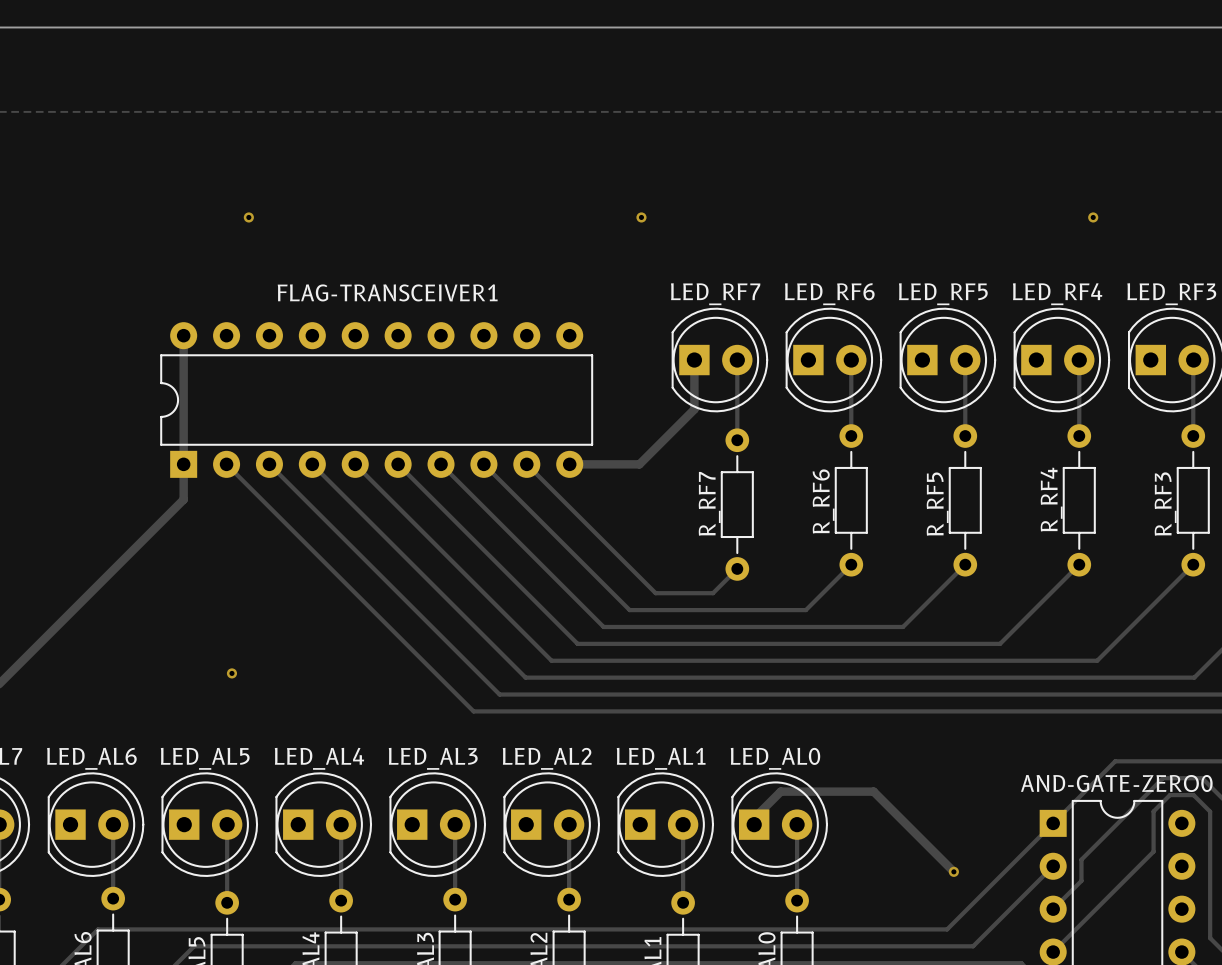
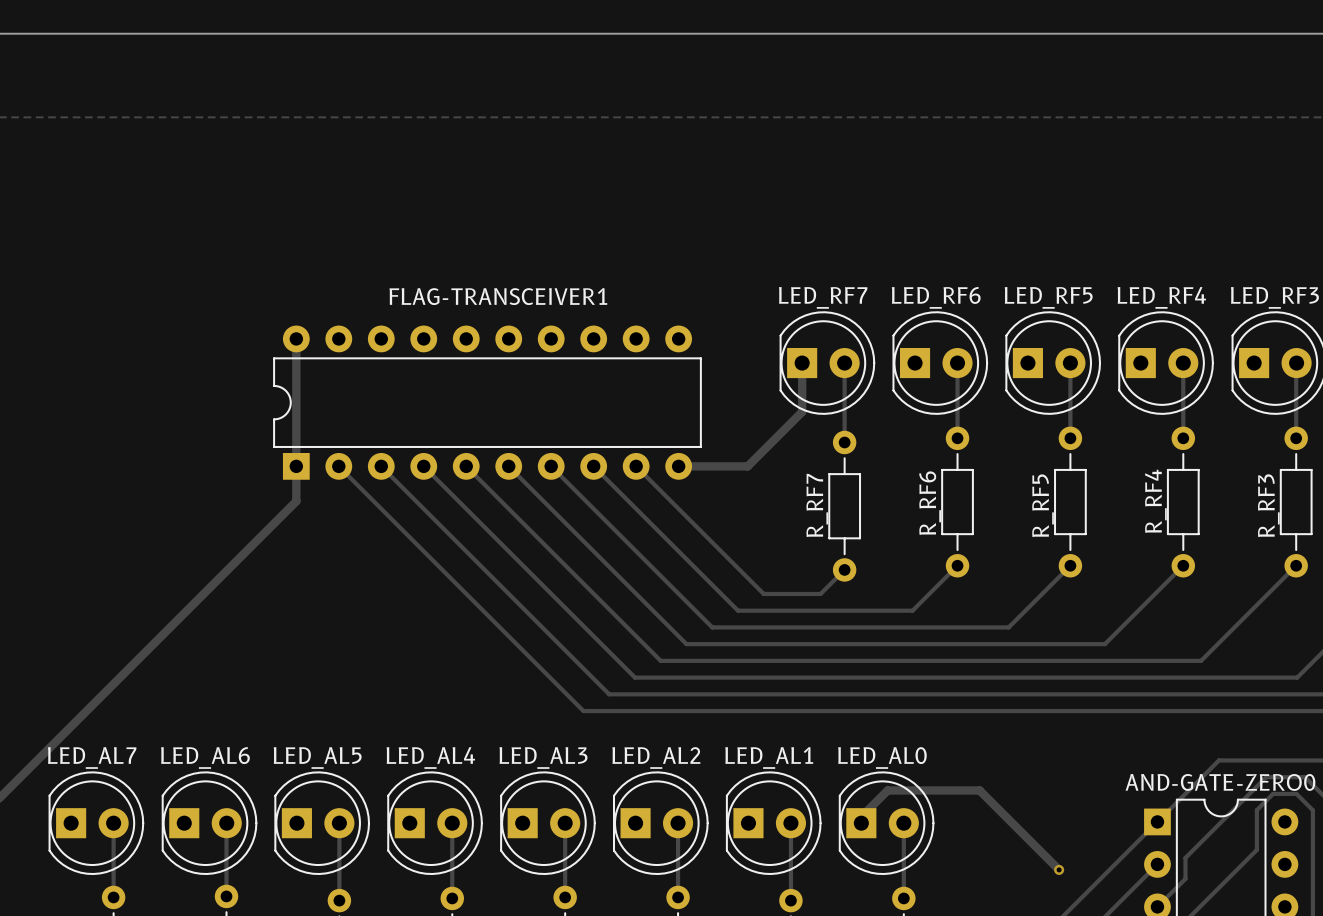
via: (248, 217) -> none
via: (641, 217) -> none
via: (1093, 217) -> none
via: (231, 673) -> none

